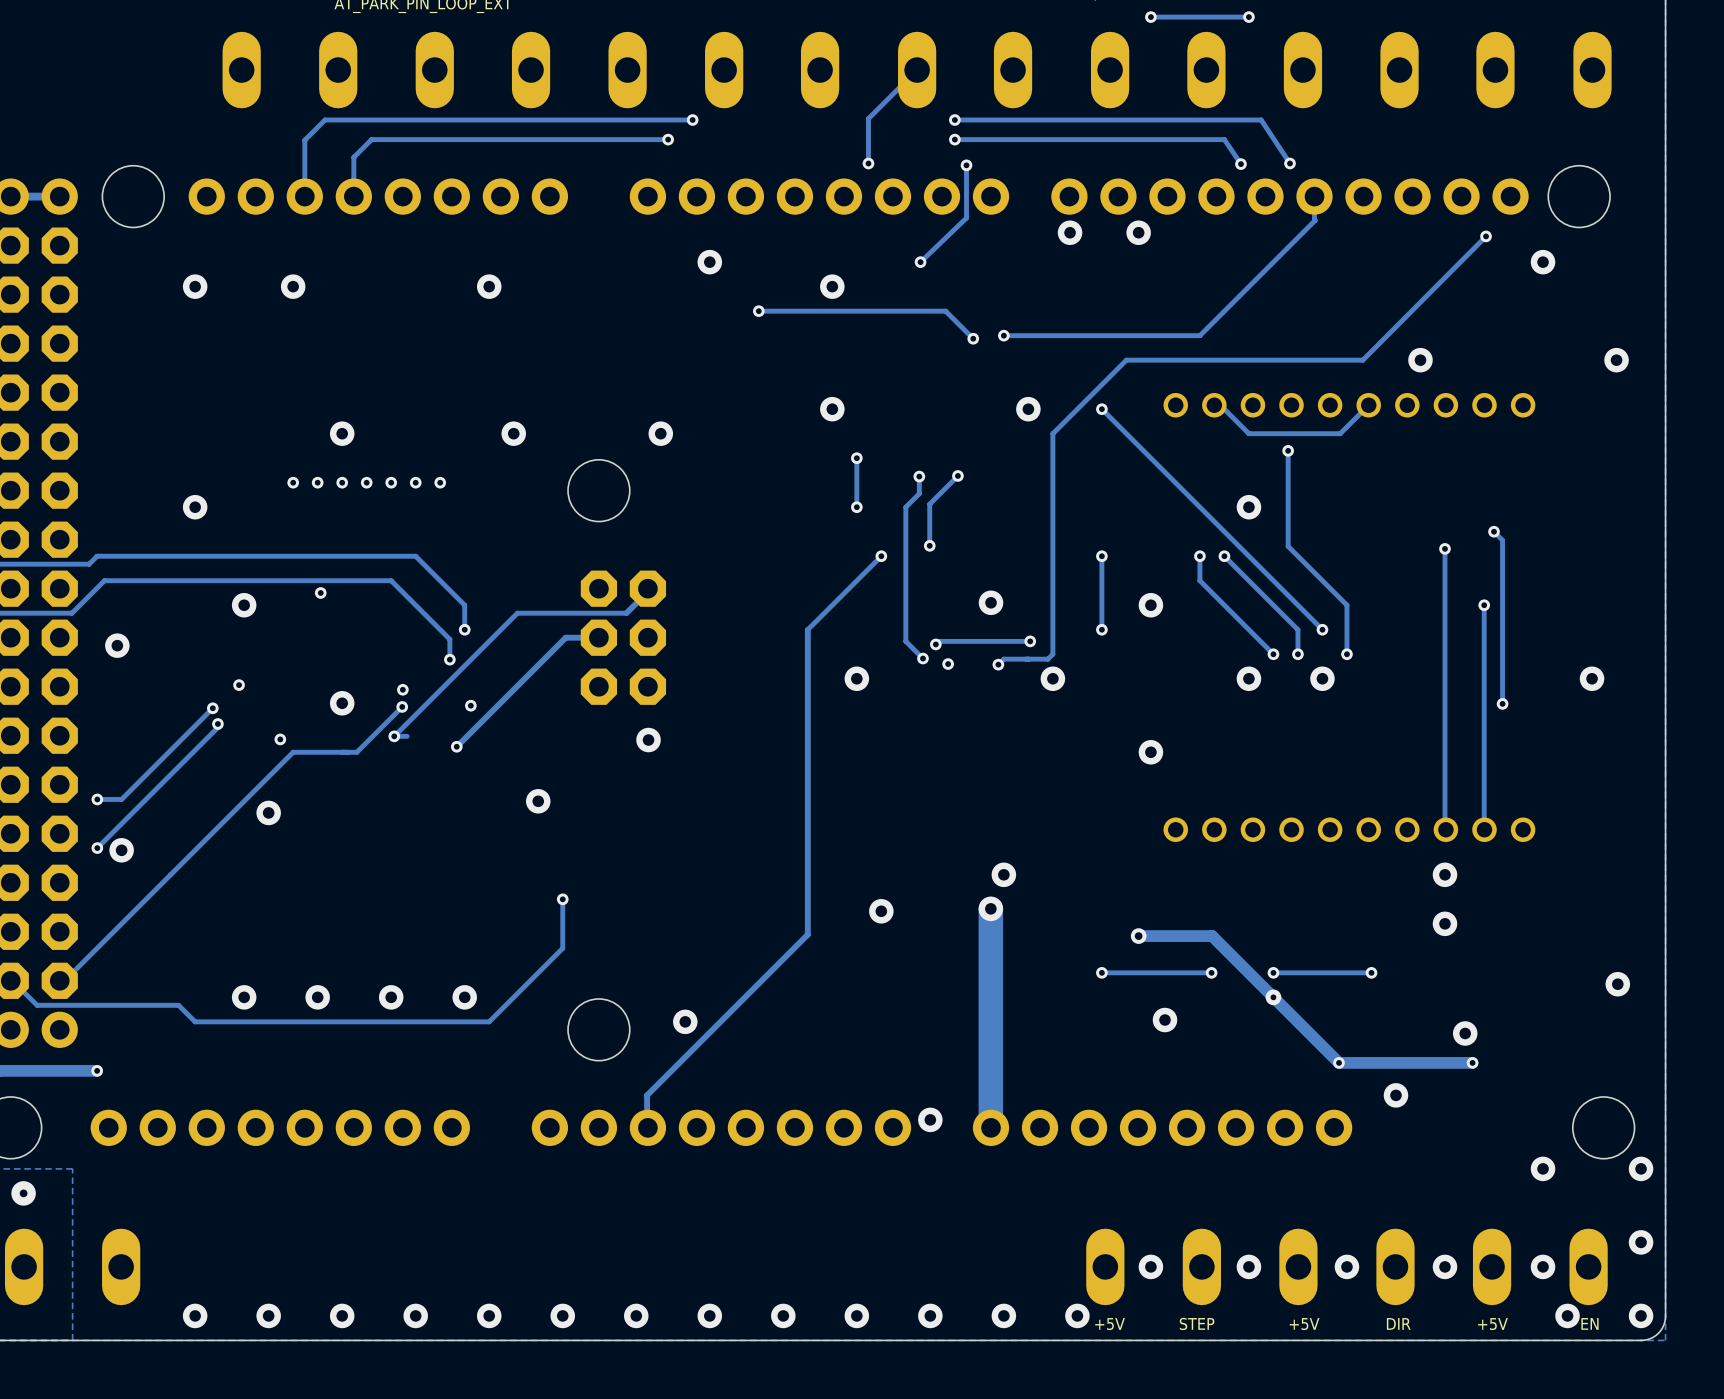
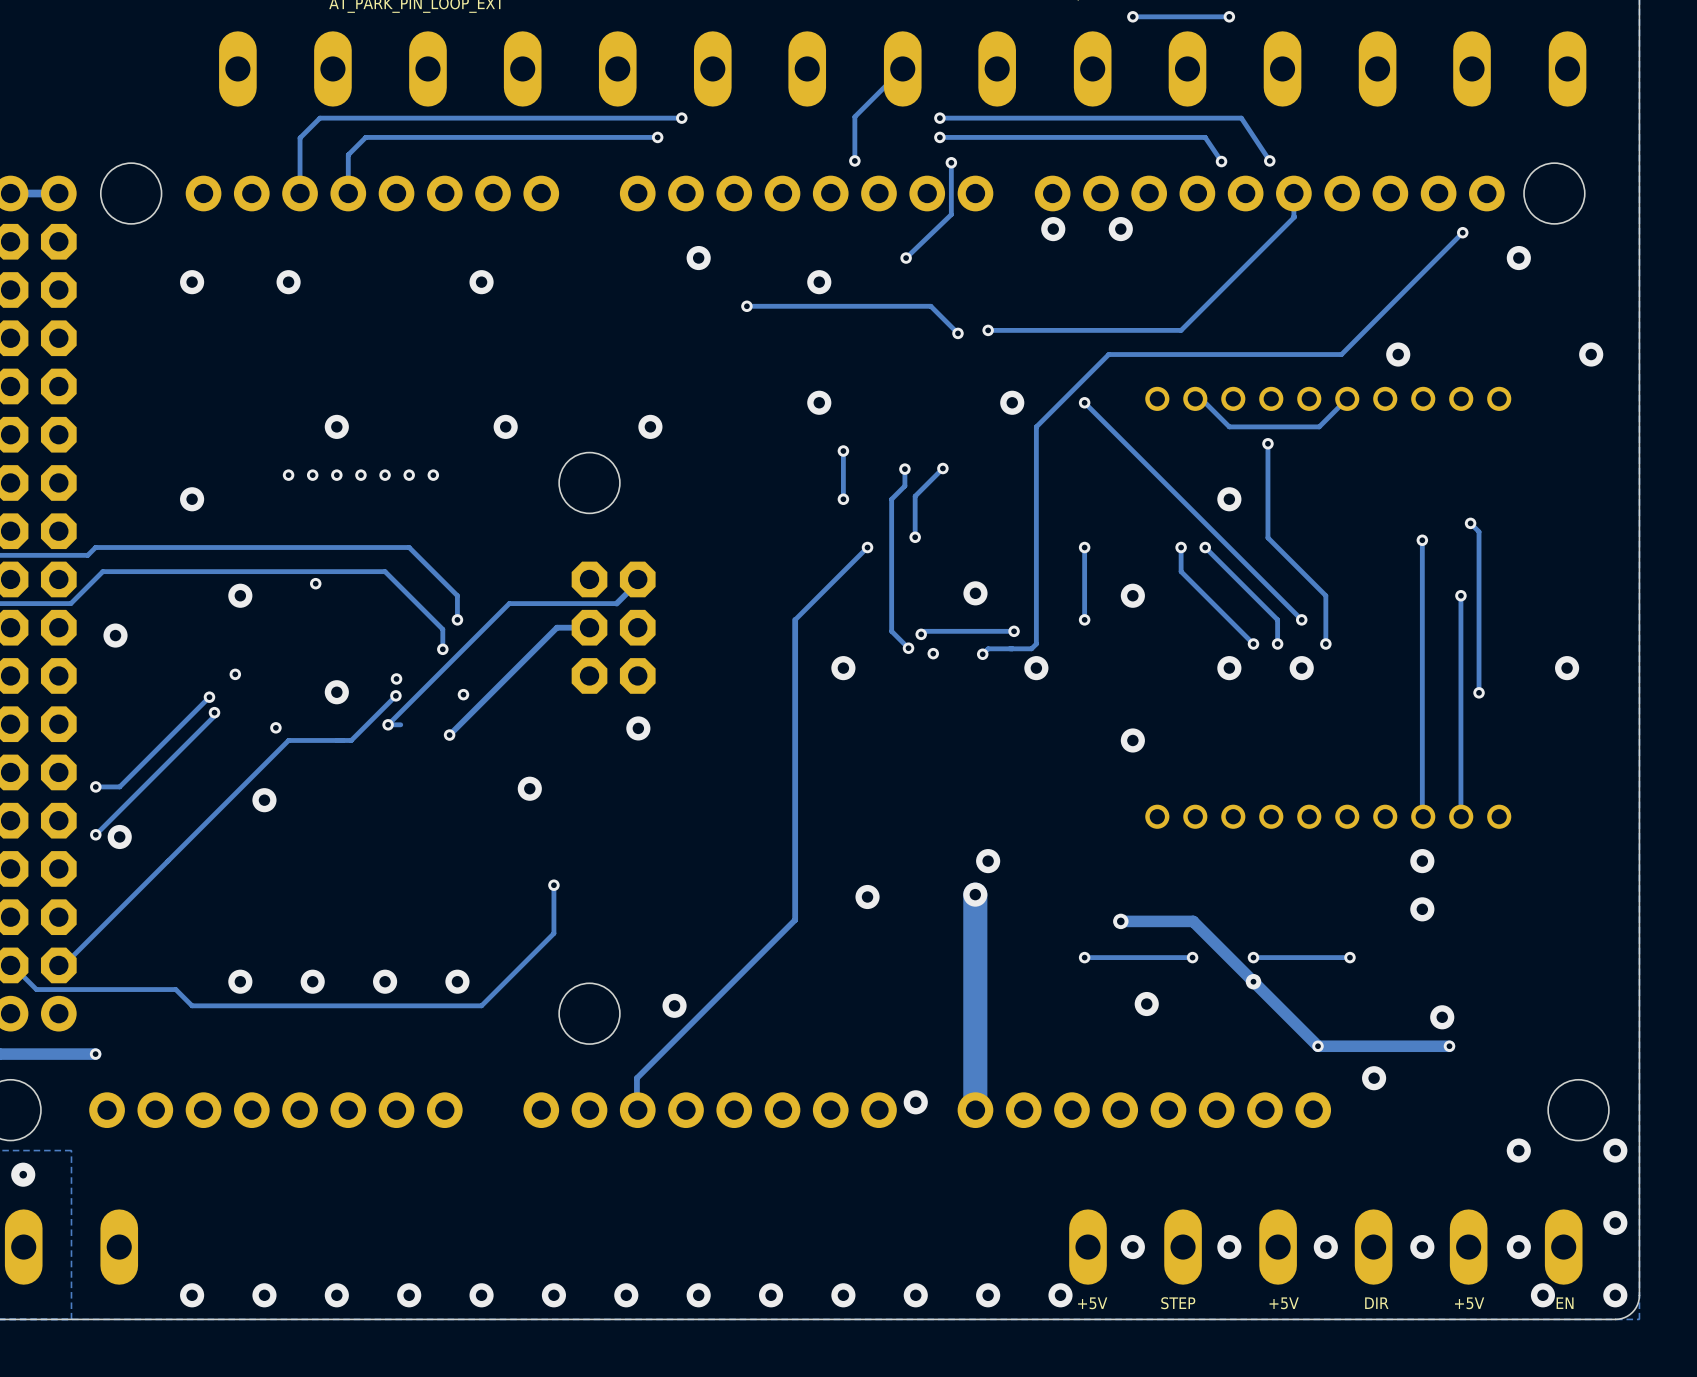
via: (1617, 984) -> none

